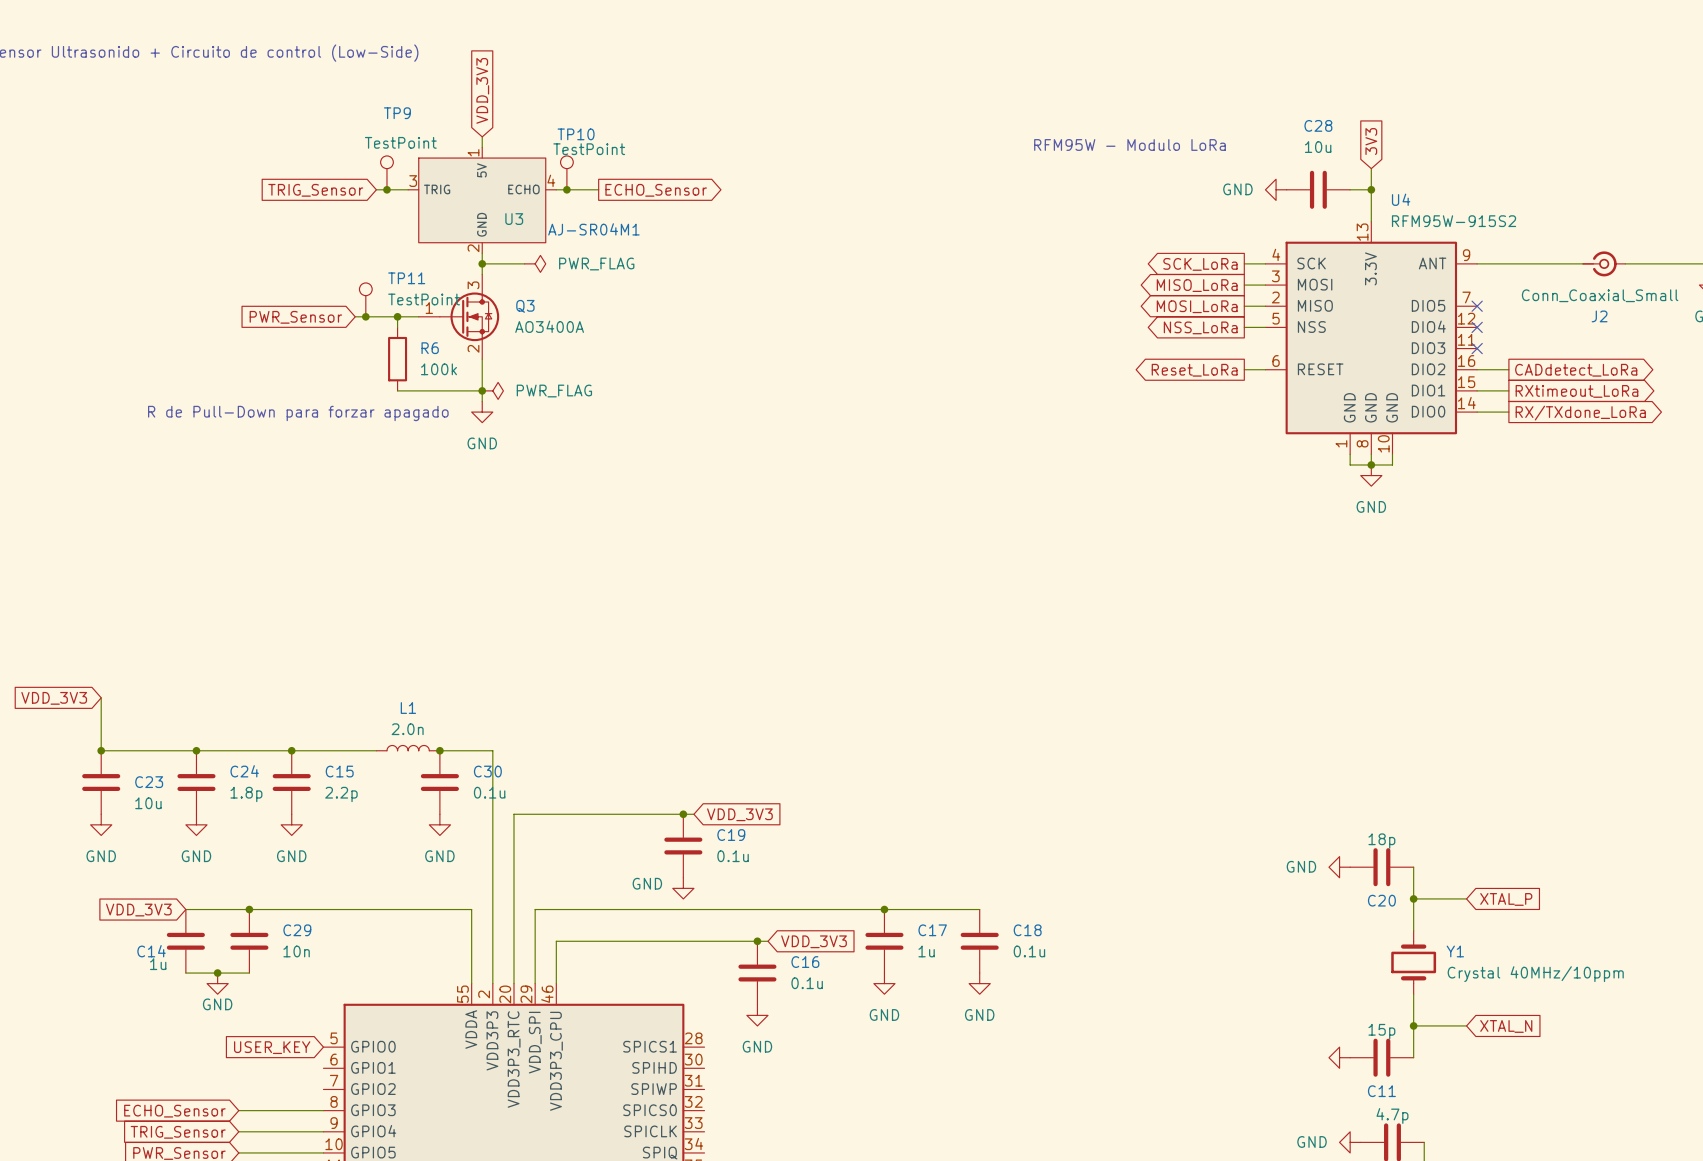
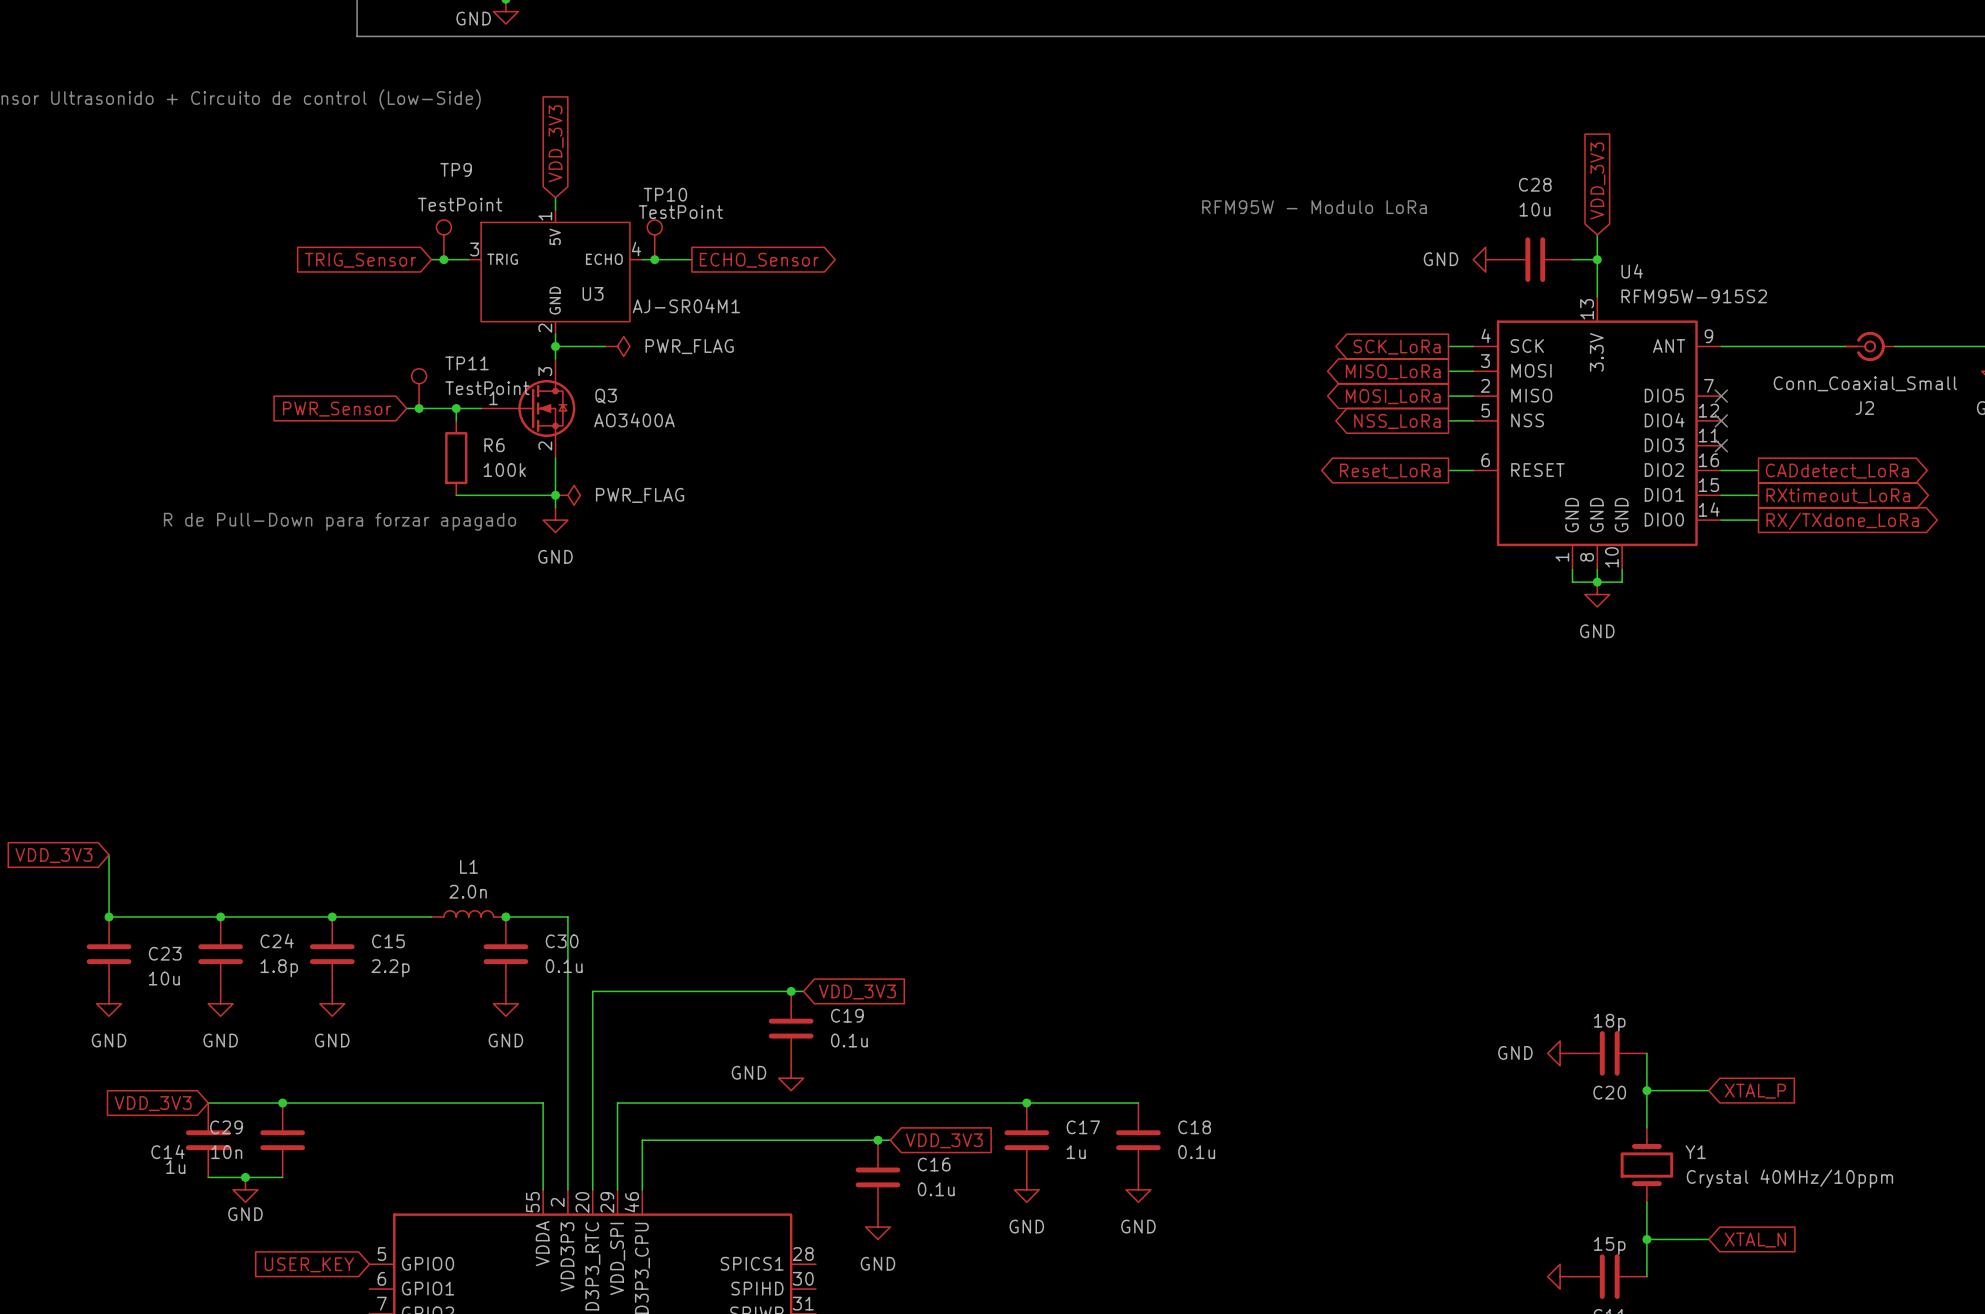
global label: 3V3 (1371, 141) -> VDD_3V3 (1597, 180)
C29 name position: C29 (297, 930) -> C29 (226, 1127)
C29 value position: 10n (296, 951) -> 10n (226, 1152)

